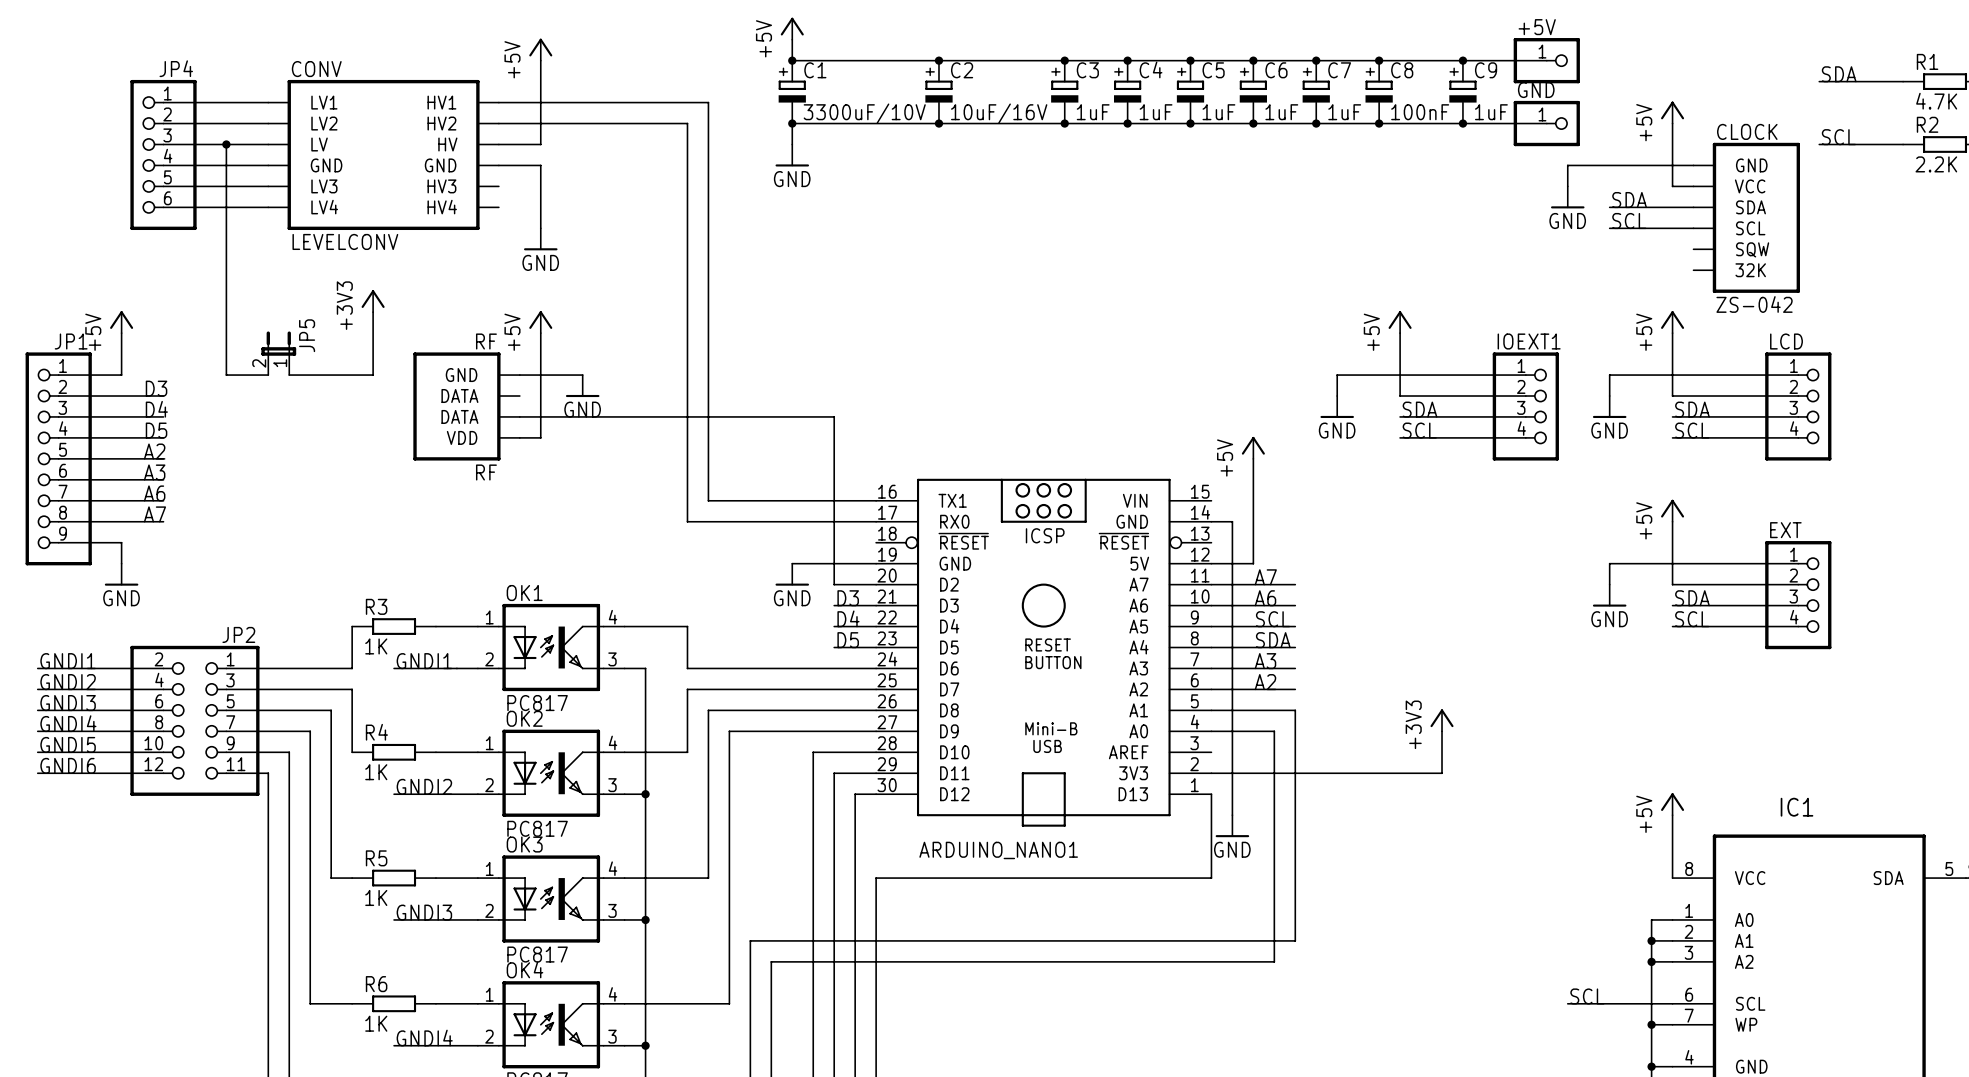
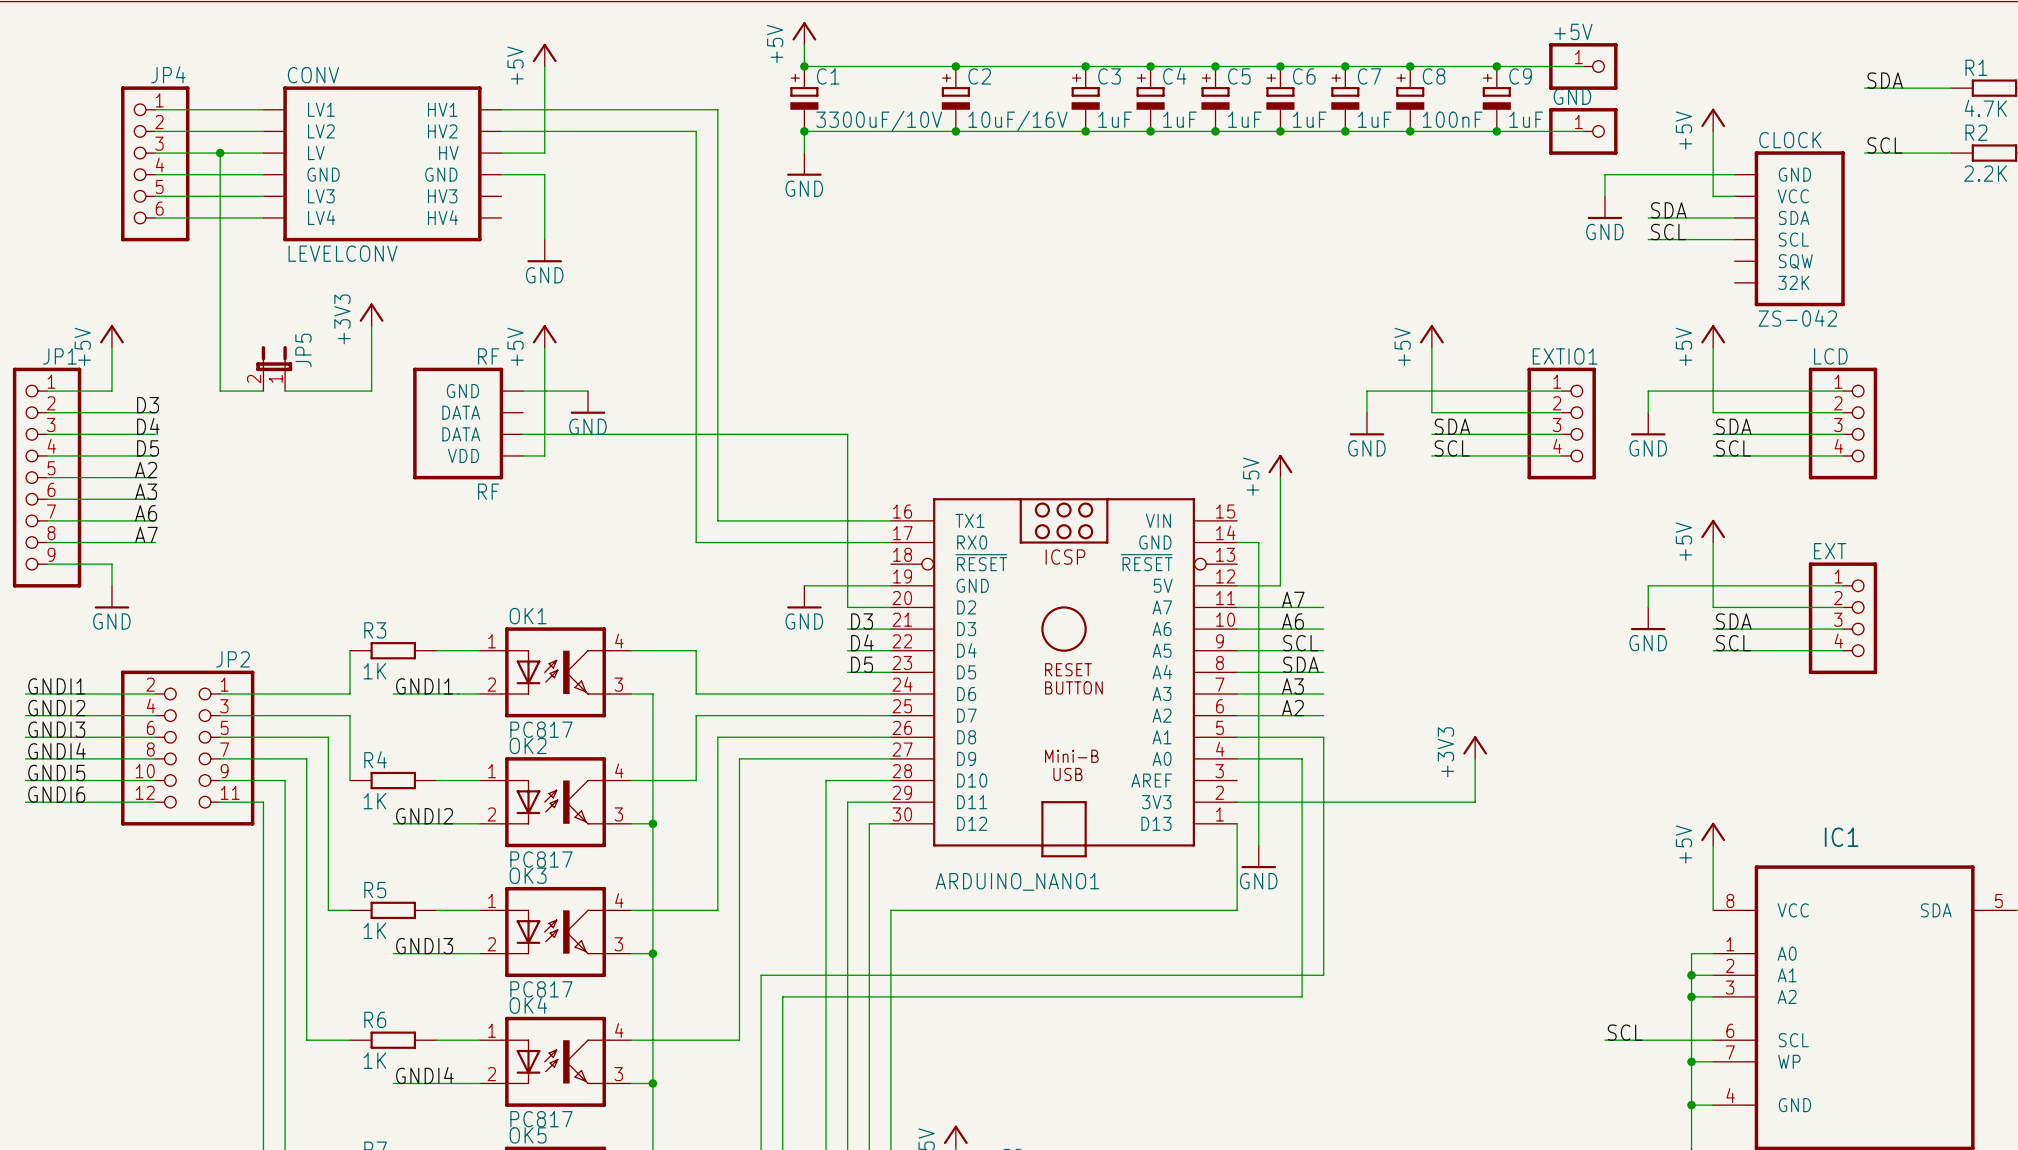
IOEXT1 name: IOEXT1 (1529, 341) -> EXTIO1 (1565, 356)

